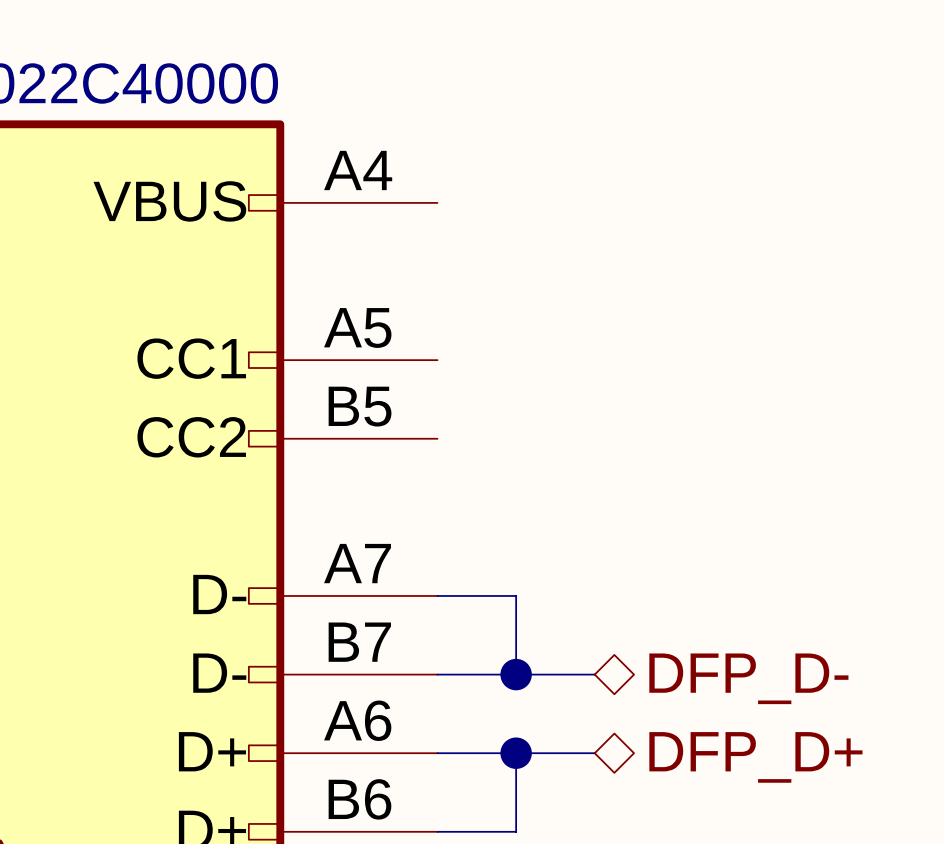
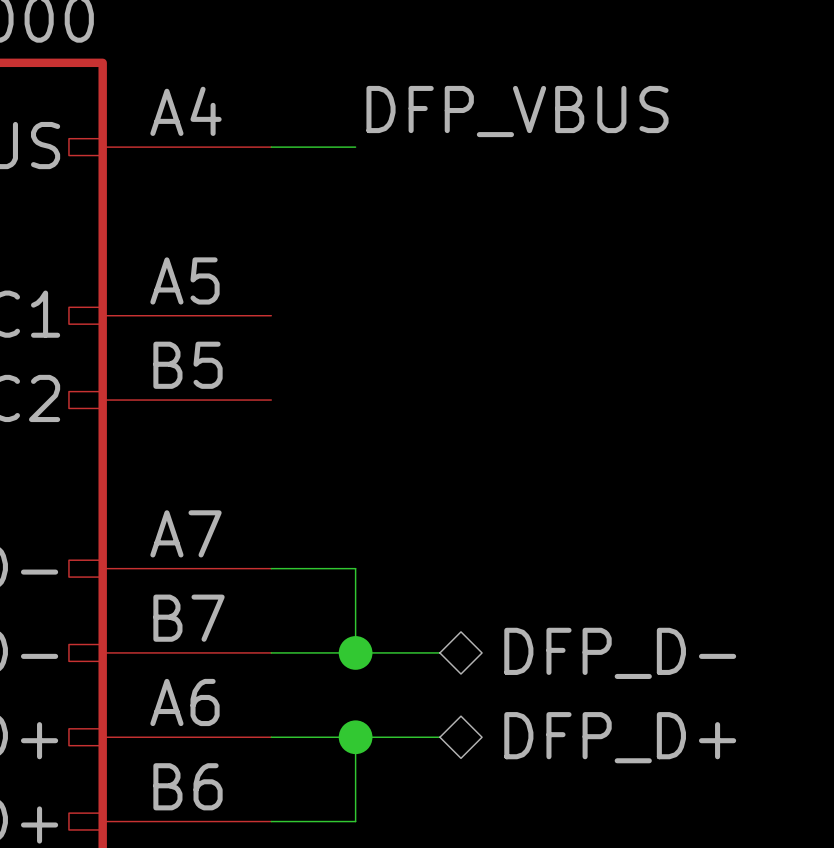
label: none -> DFP_VBUS (517, 111)
wire: none -> (271, 147) (355, 147)

